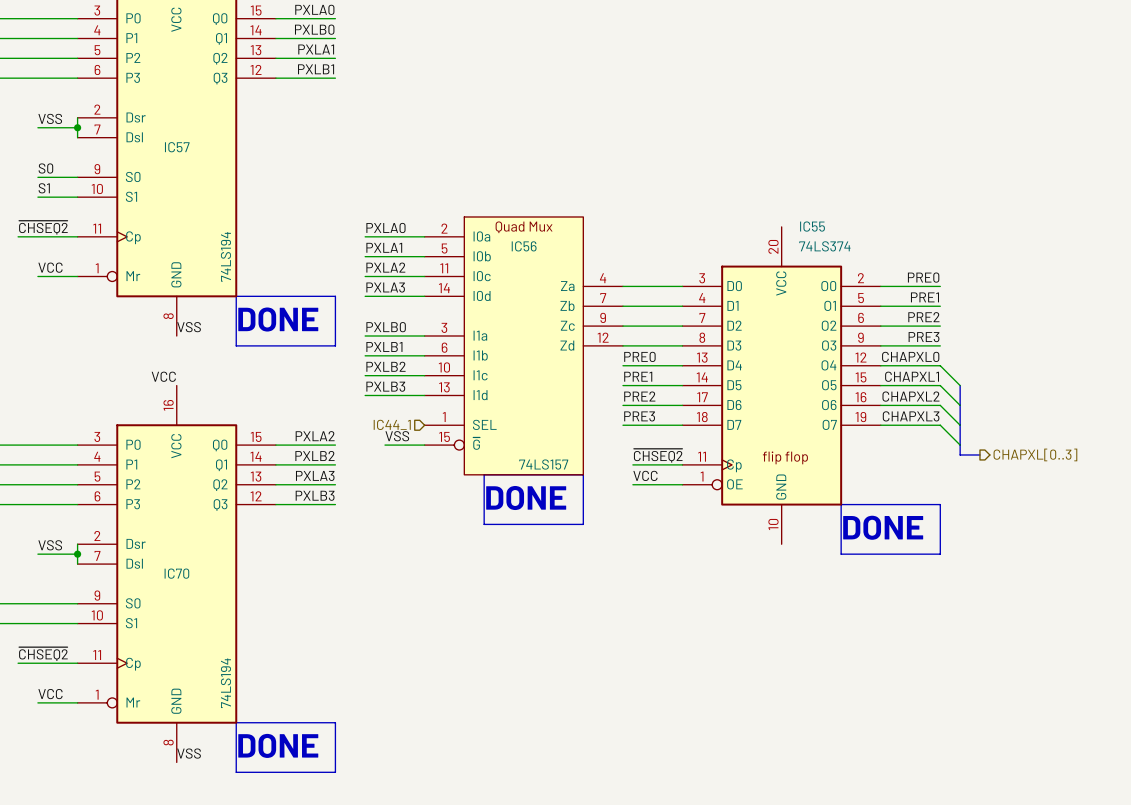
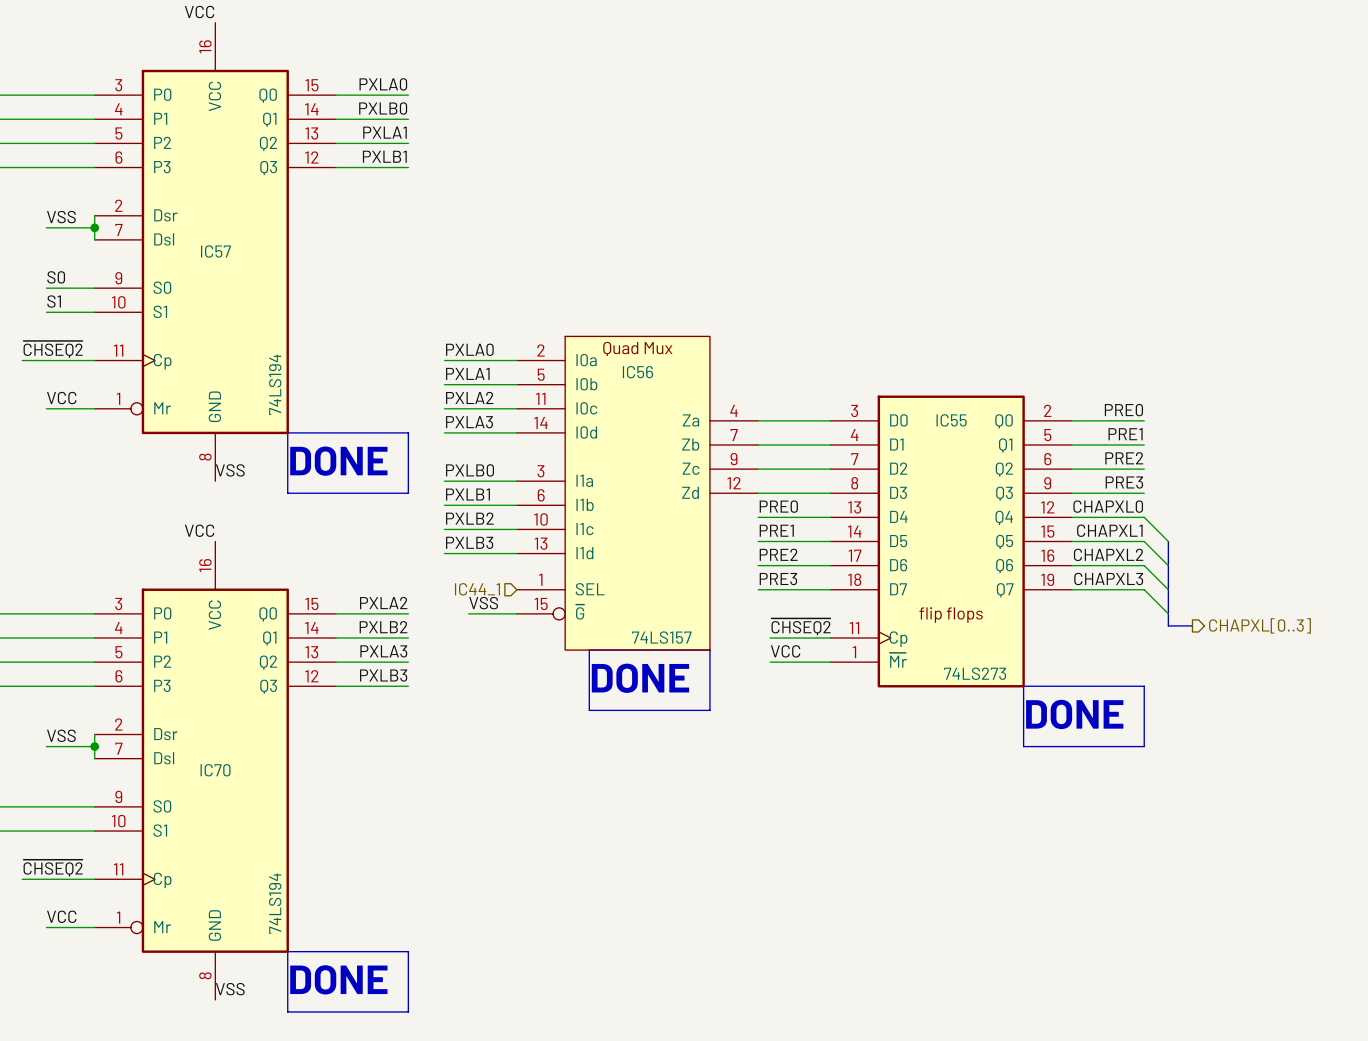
IC55 symbol: [682, 226, 881, 545] -> [830, 395, 1072, 688]
IC55 name position: IC55 (812, 226) -> IC55 (951, 420)
IC55 value: 74LS374 (824, 246) -> 74LS273 (975, 673)

